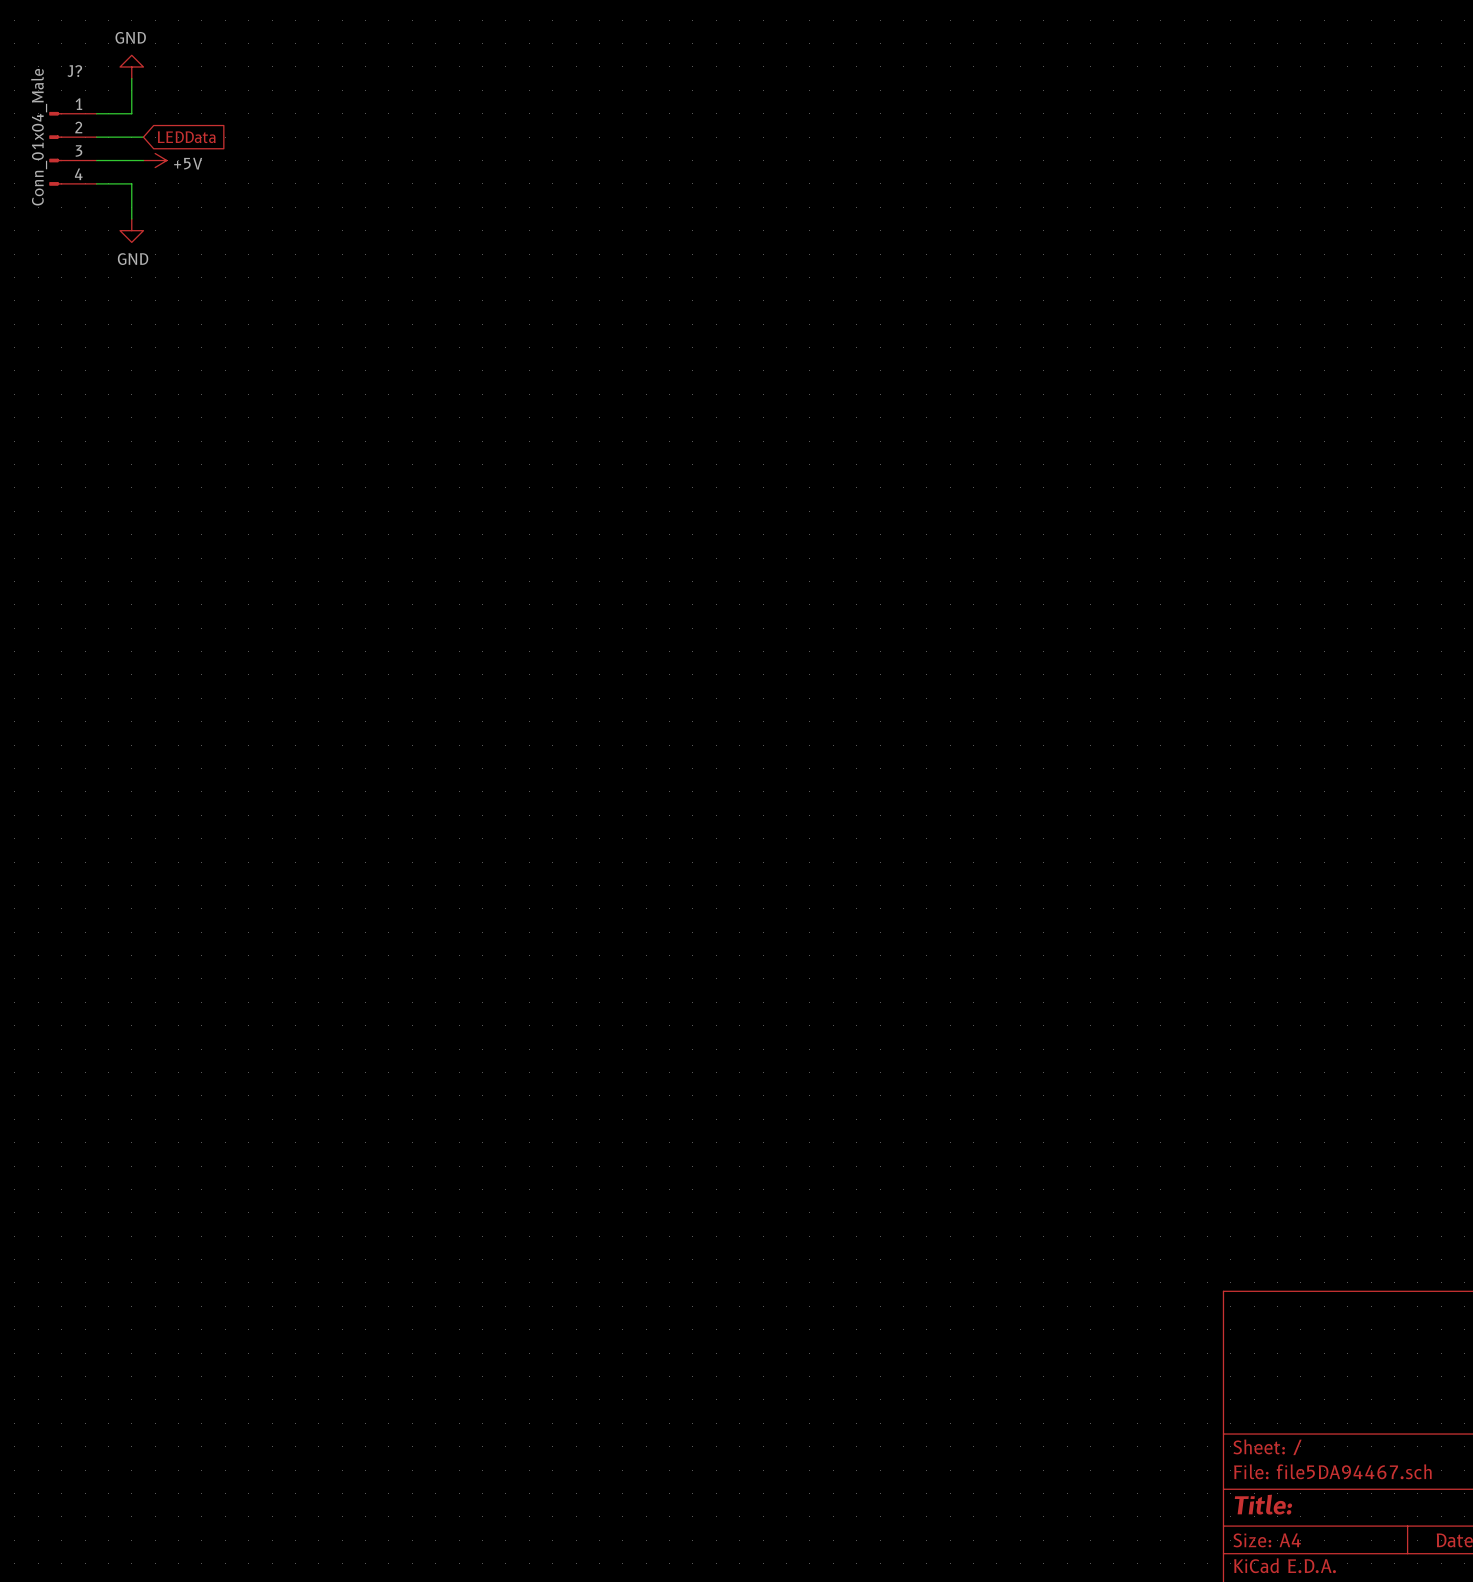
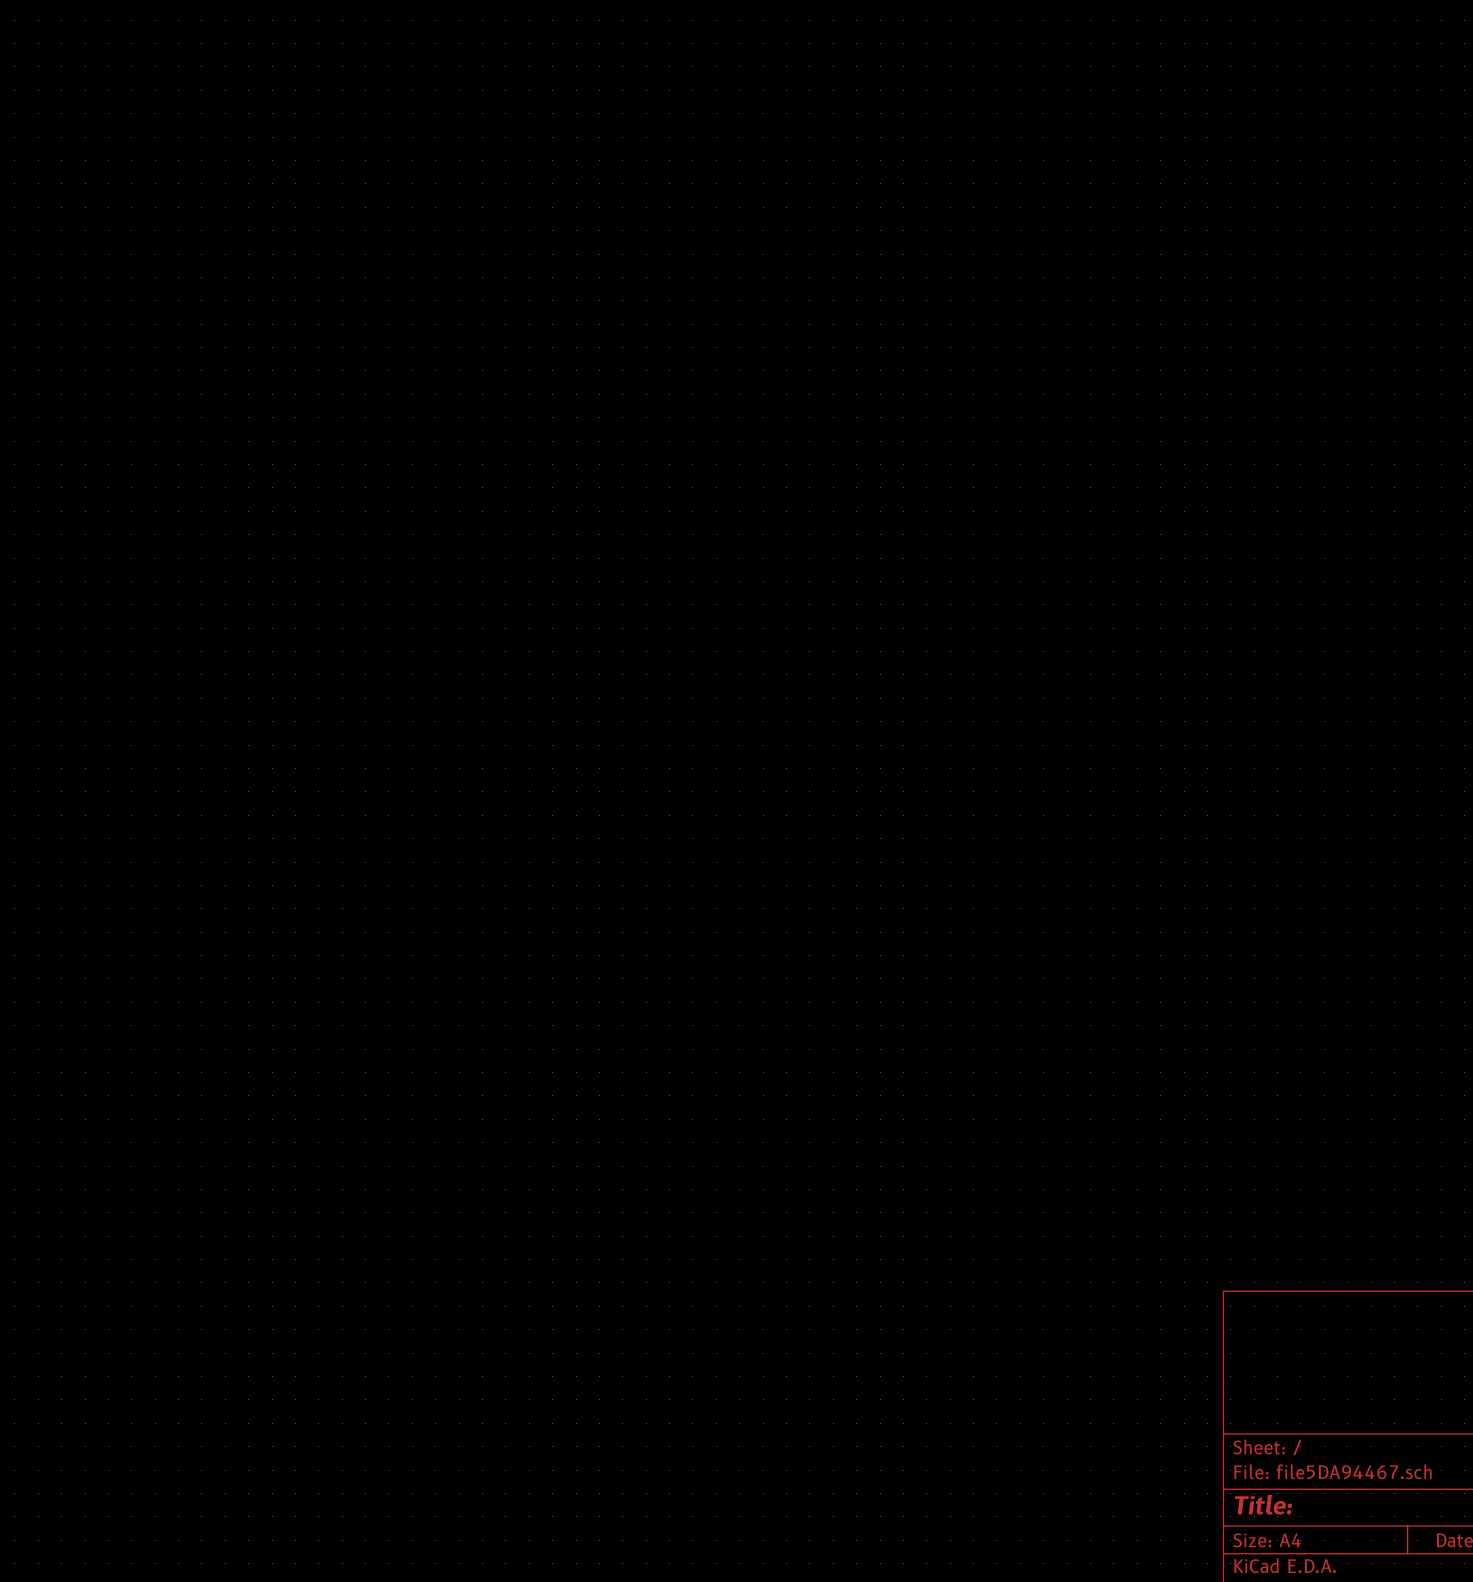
power symbol: GND (131, 66) -> none
wire: (131, 78) (131, 113) (96, 113) -> none
wire: (96, 137) (143, 137) -> none
global label: LEDData (186, 137) -> none
J?: Conn_01x04_Male (72, 148) -> none
wire: (96, 160) (143, 160) -> none
power symbol: +5V (155, 160) -> none
wire: (96, 183) (131, 183) (131, 218) -> none
power symbol: GND (131, 230) -> none

